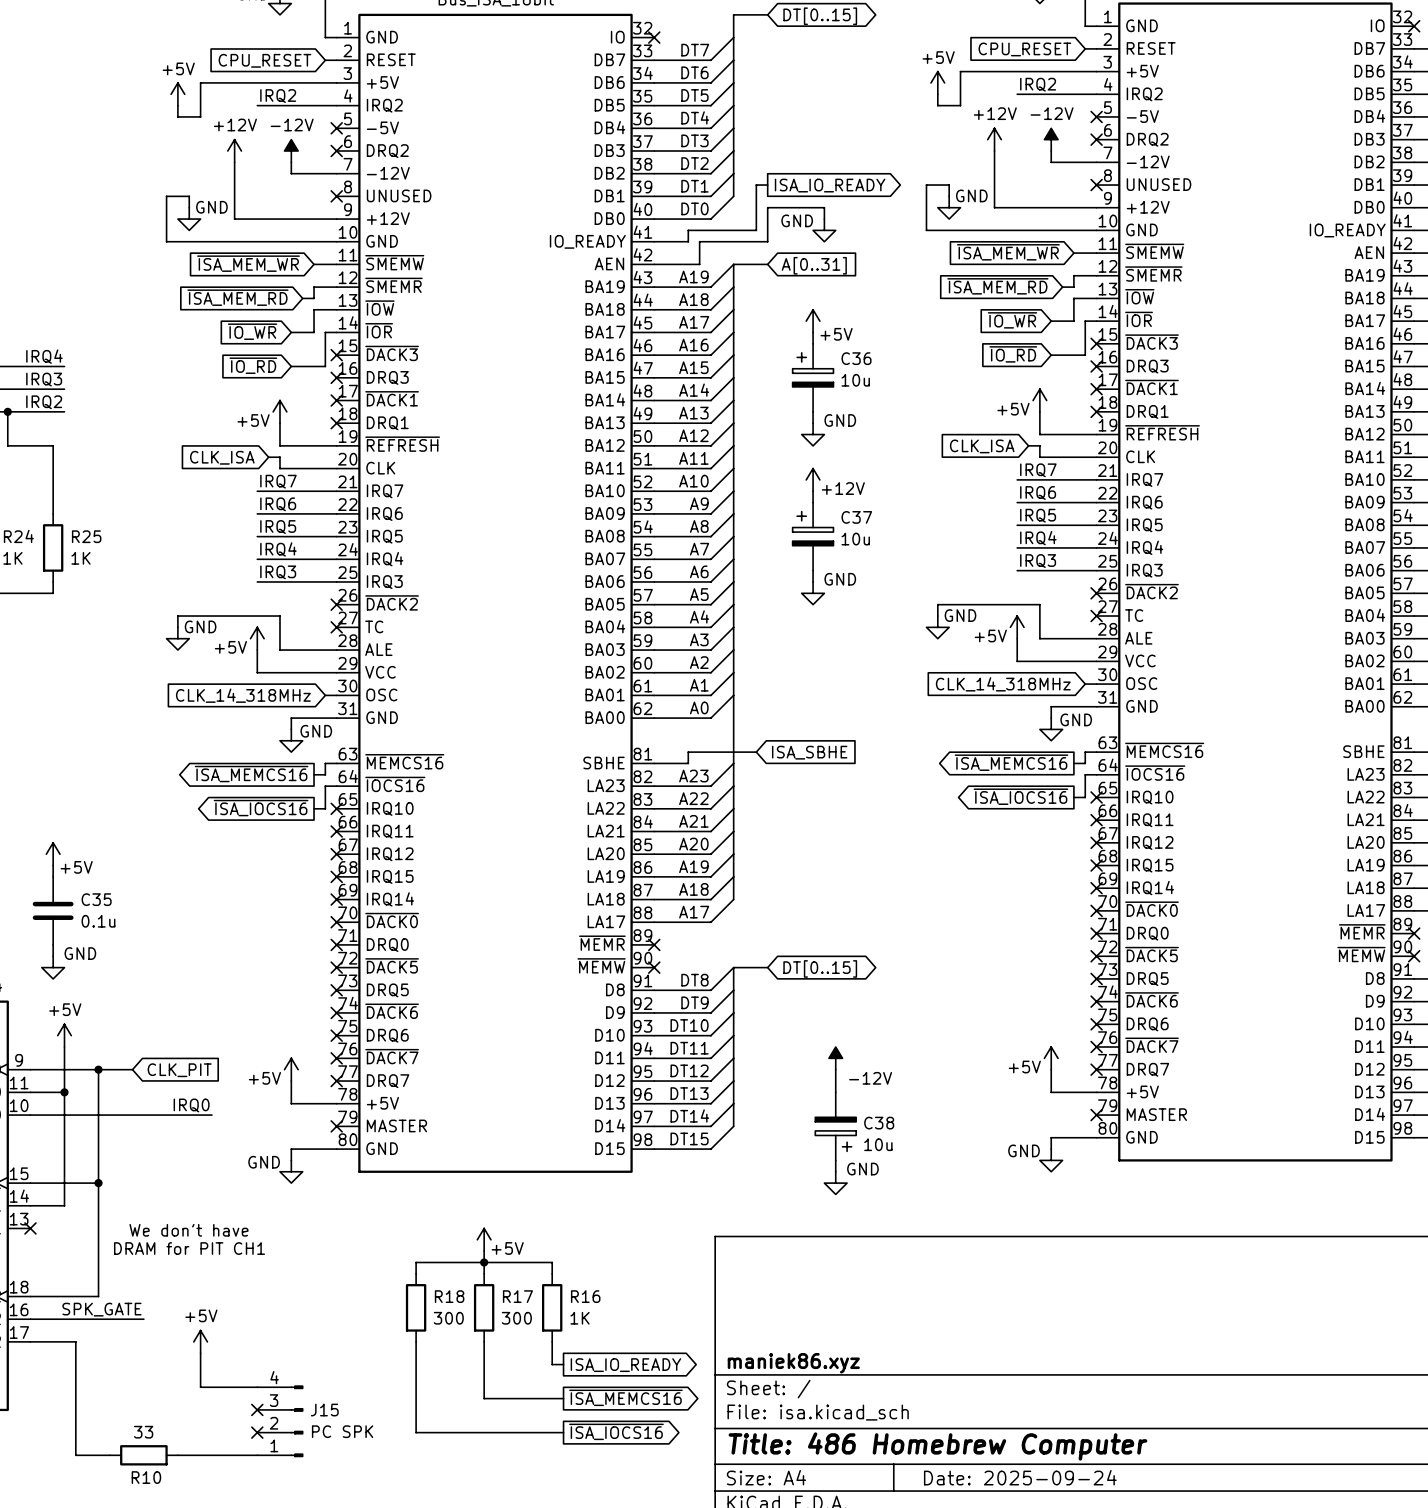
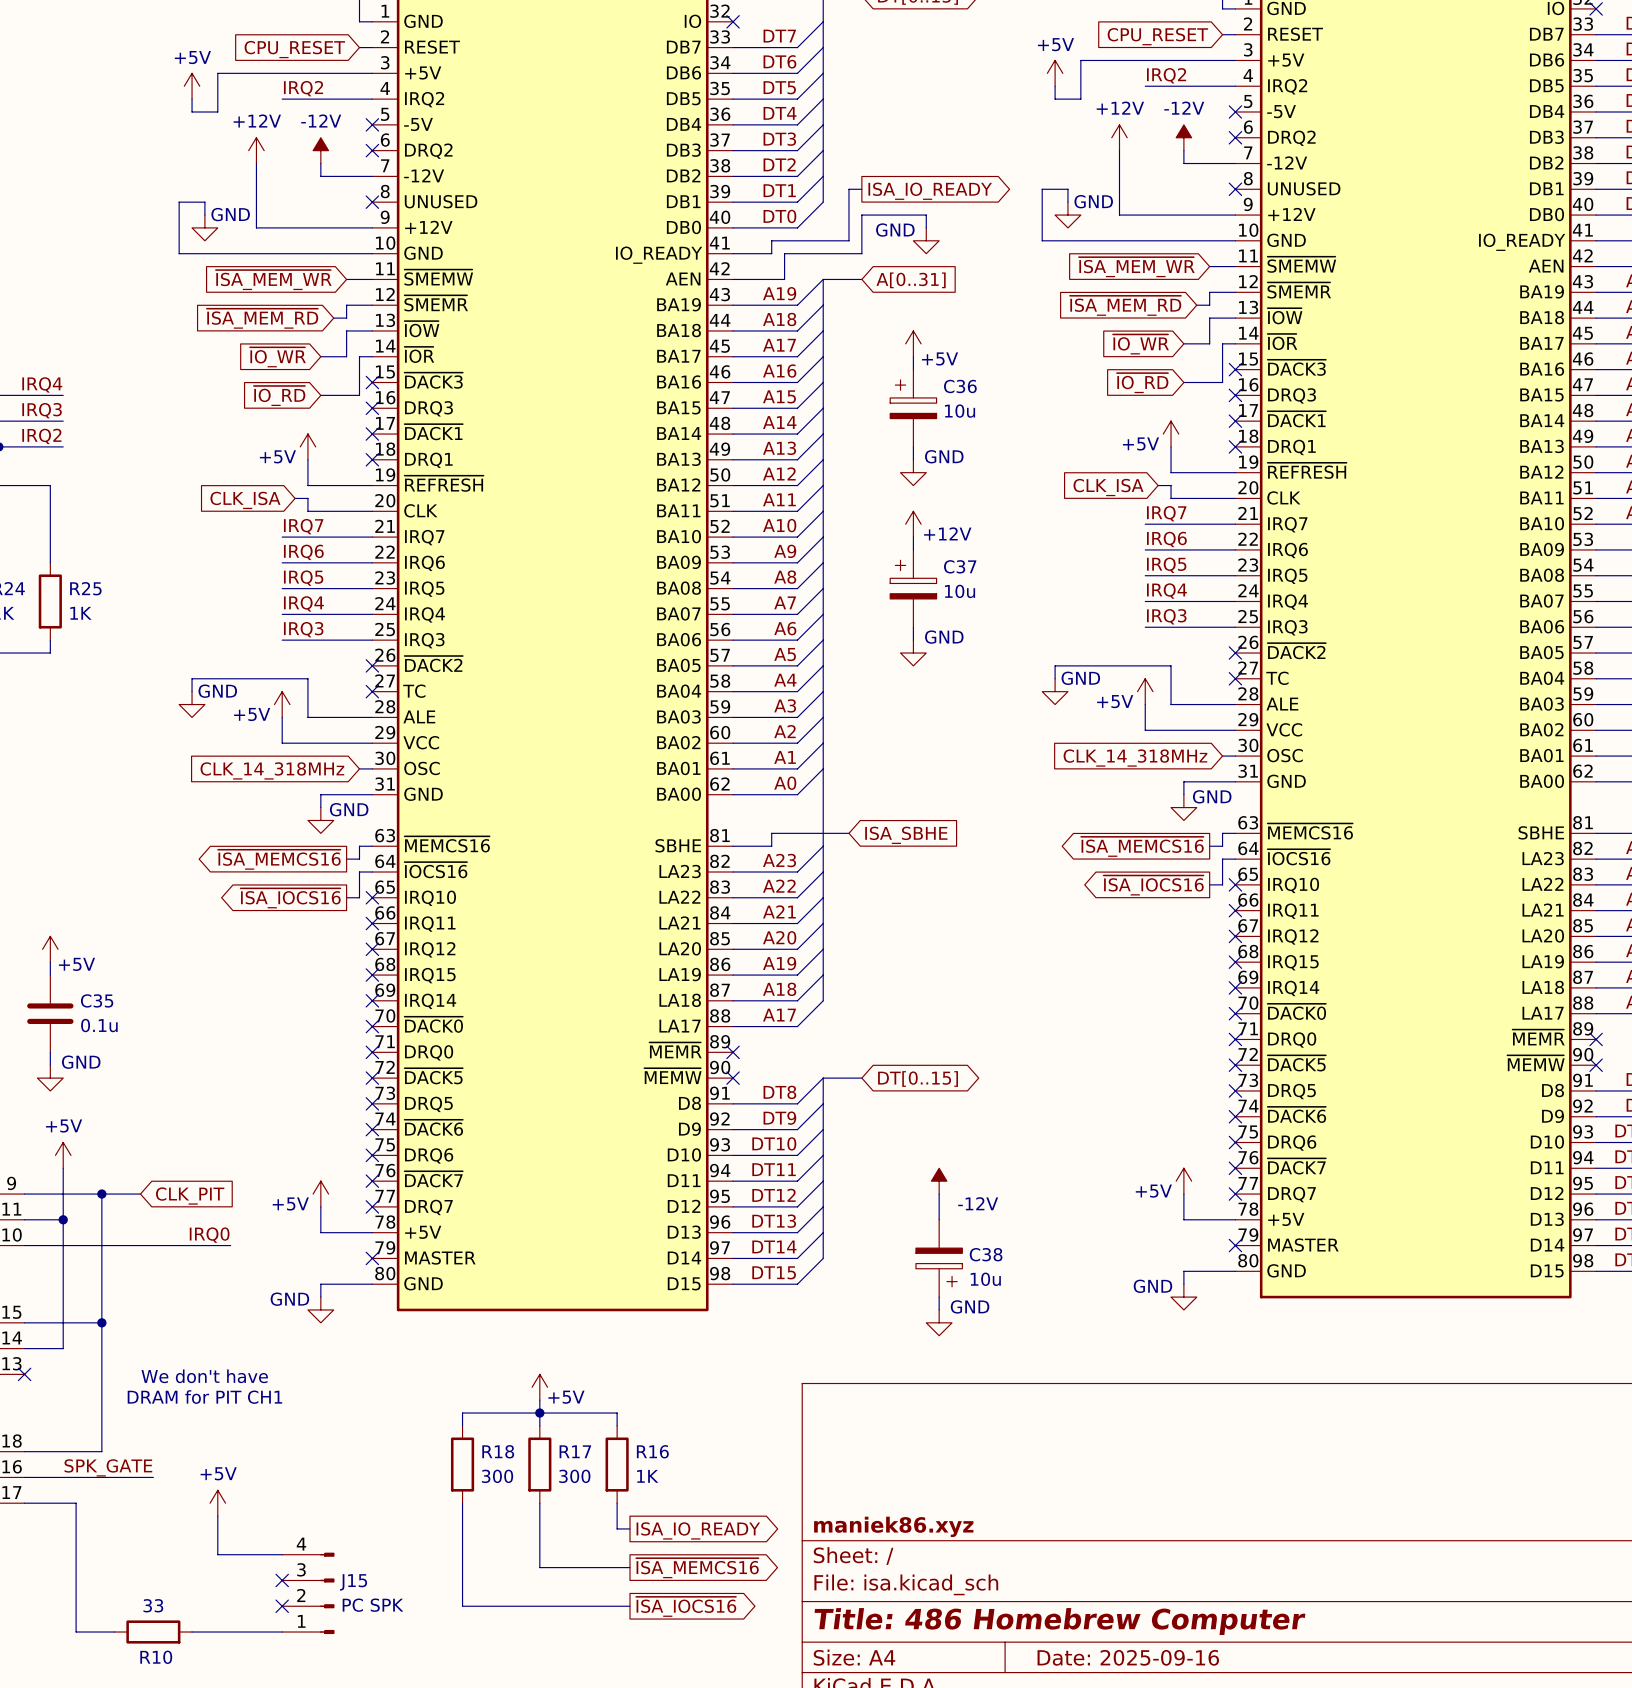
title block: Date: 2025-09-24 (1020, 1477) -> Date: 2025-09-16 (1128, 1657)

